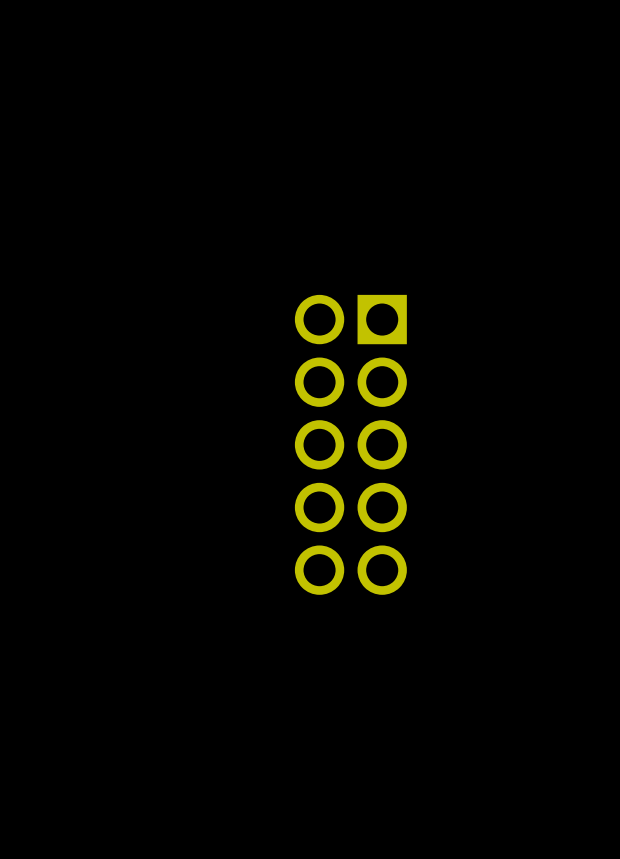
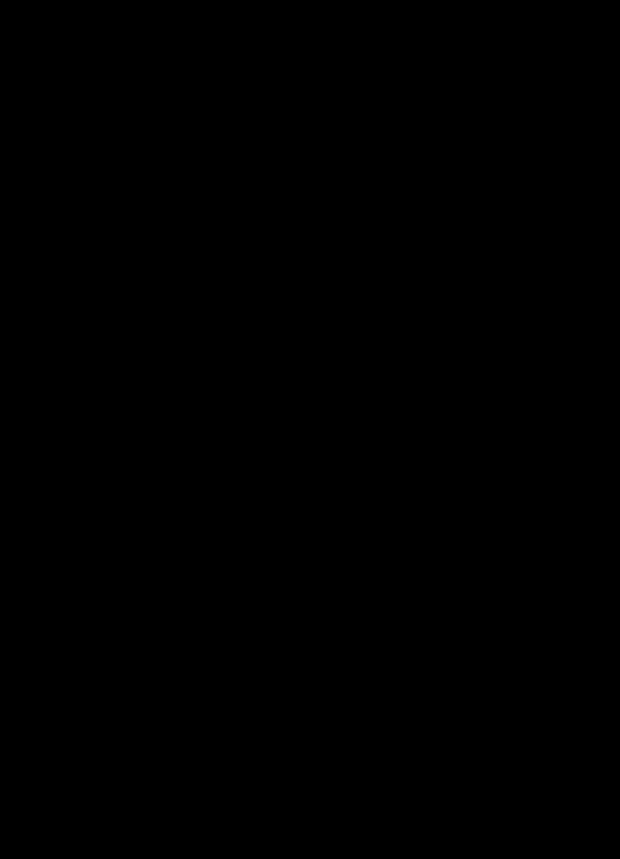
part: (350, 444) -> none

